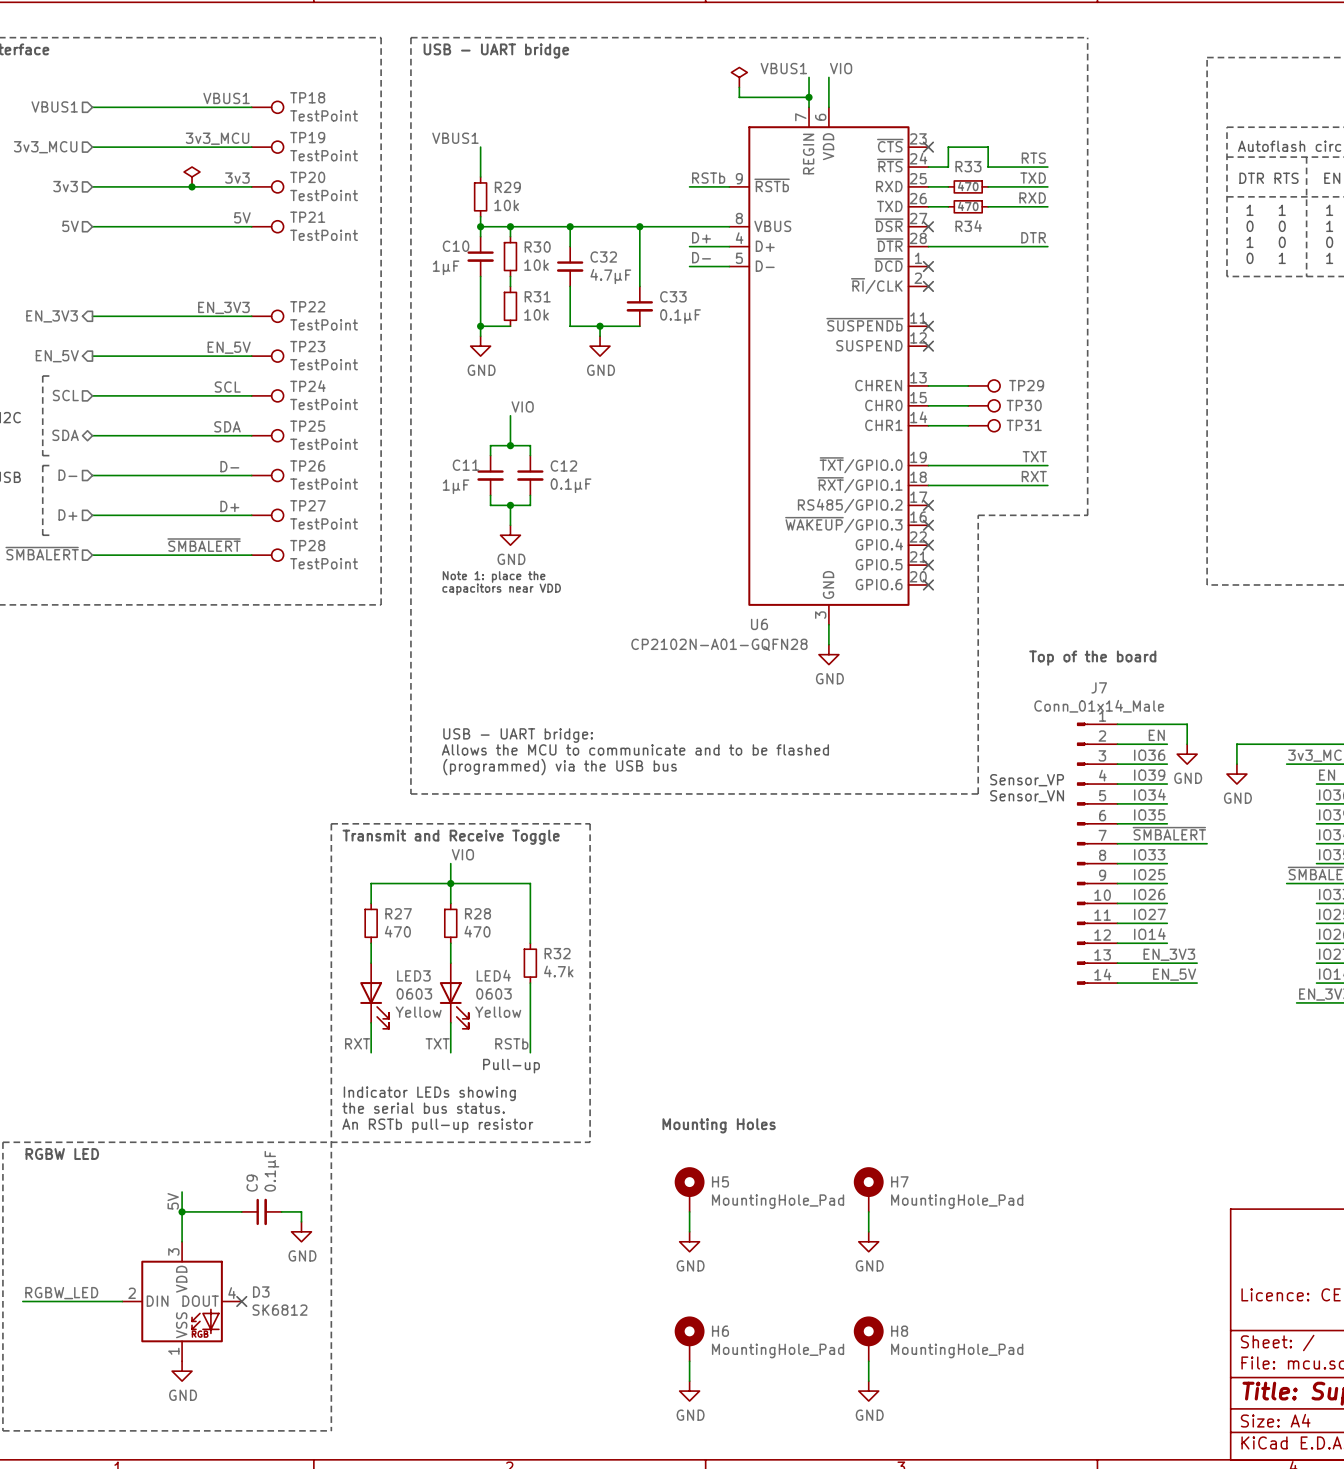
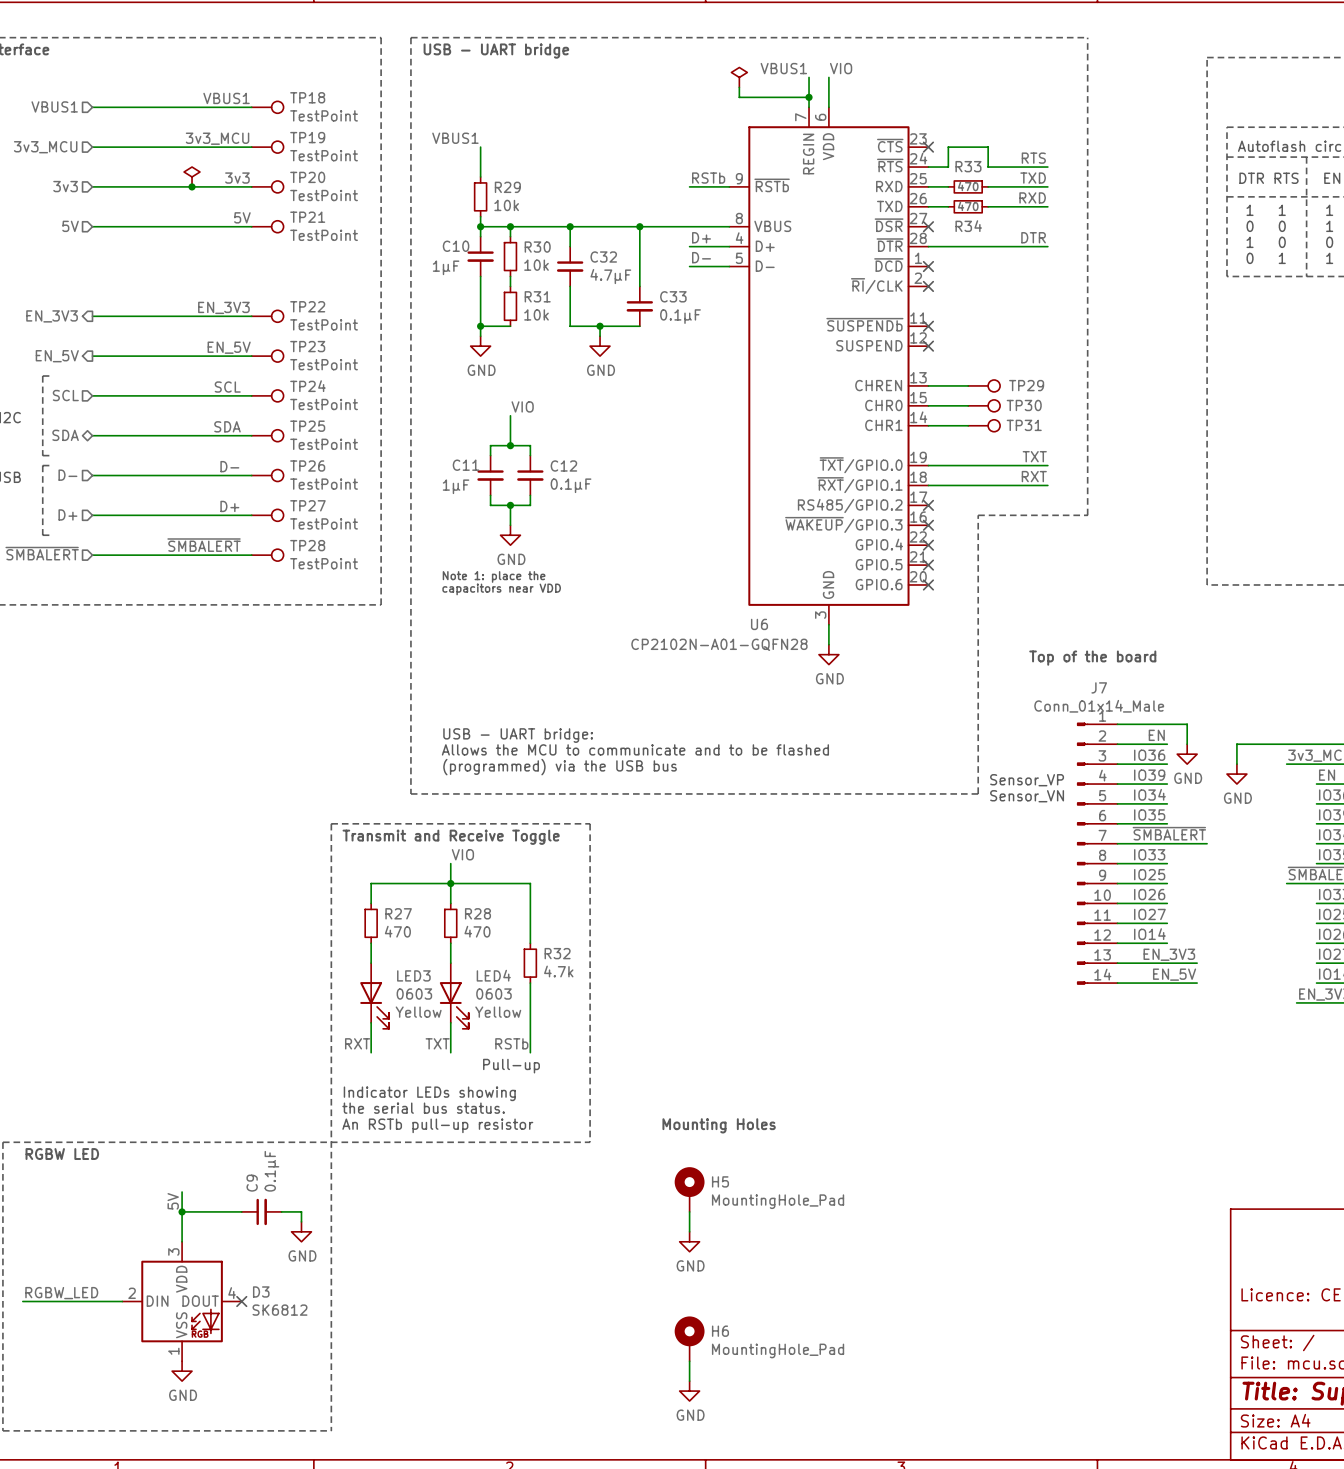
H7: MountingHole_Pad (868, 1189) -> none
wire: (868, 1211) (868, 1231) -> none
power symbol: GND (868, 1241) -> none
H8: MountingHole_Pad (868, 1338) -> none
wire: (868, 1361) (868, 1381) -> none
power symbol: GND (868, 1391) -> none

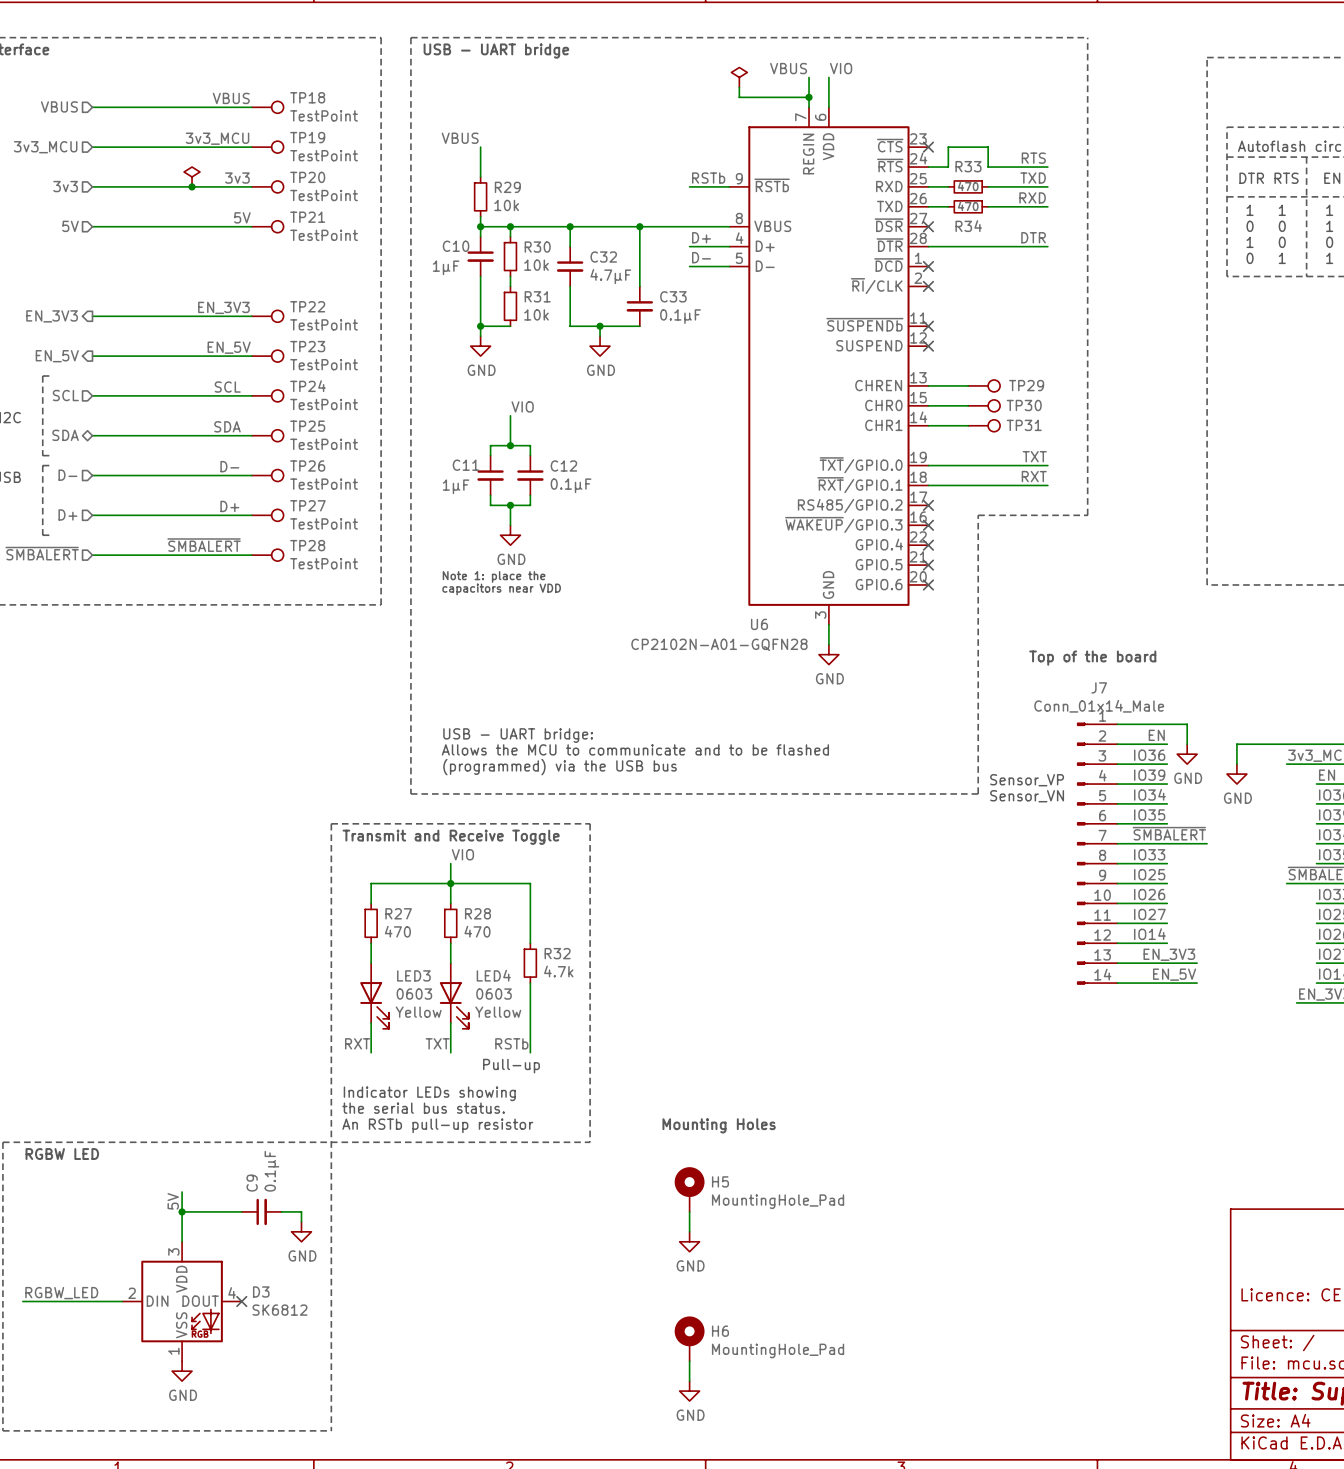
label: VBUS1 (783, 68) -> VBUS (788, 68)
label: VBUS1 (226, 98) -> VBUS (231, 98)
hierarchical label: VBUS1 (54, 106) -> VBUS (59, 106)
label: VBUS1 (455, 138) -> VBUS (460, 138)

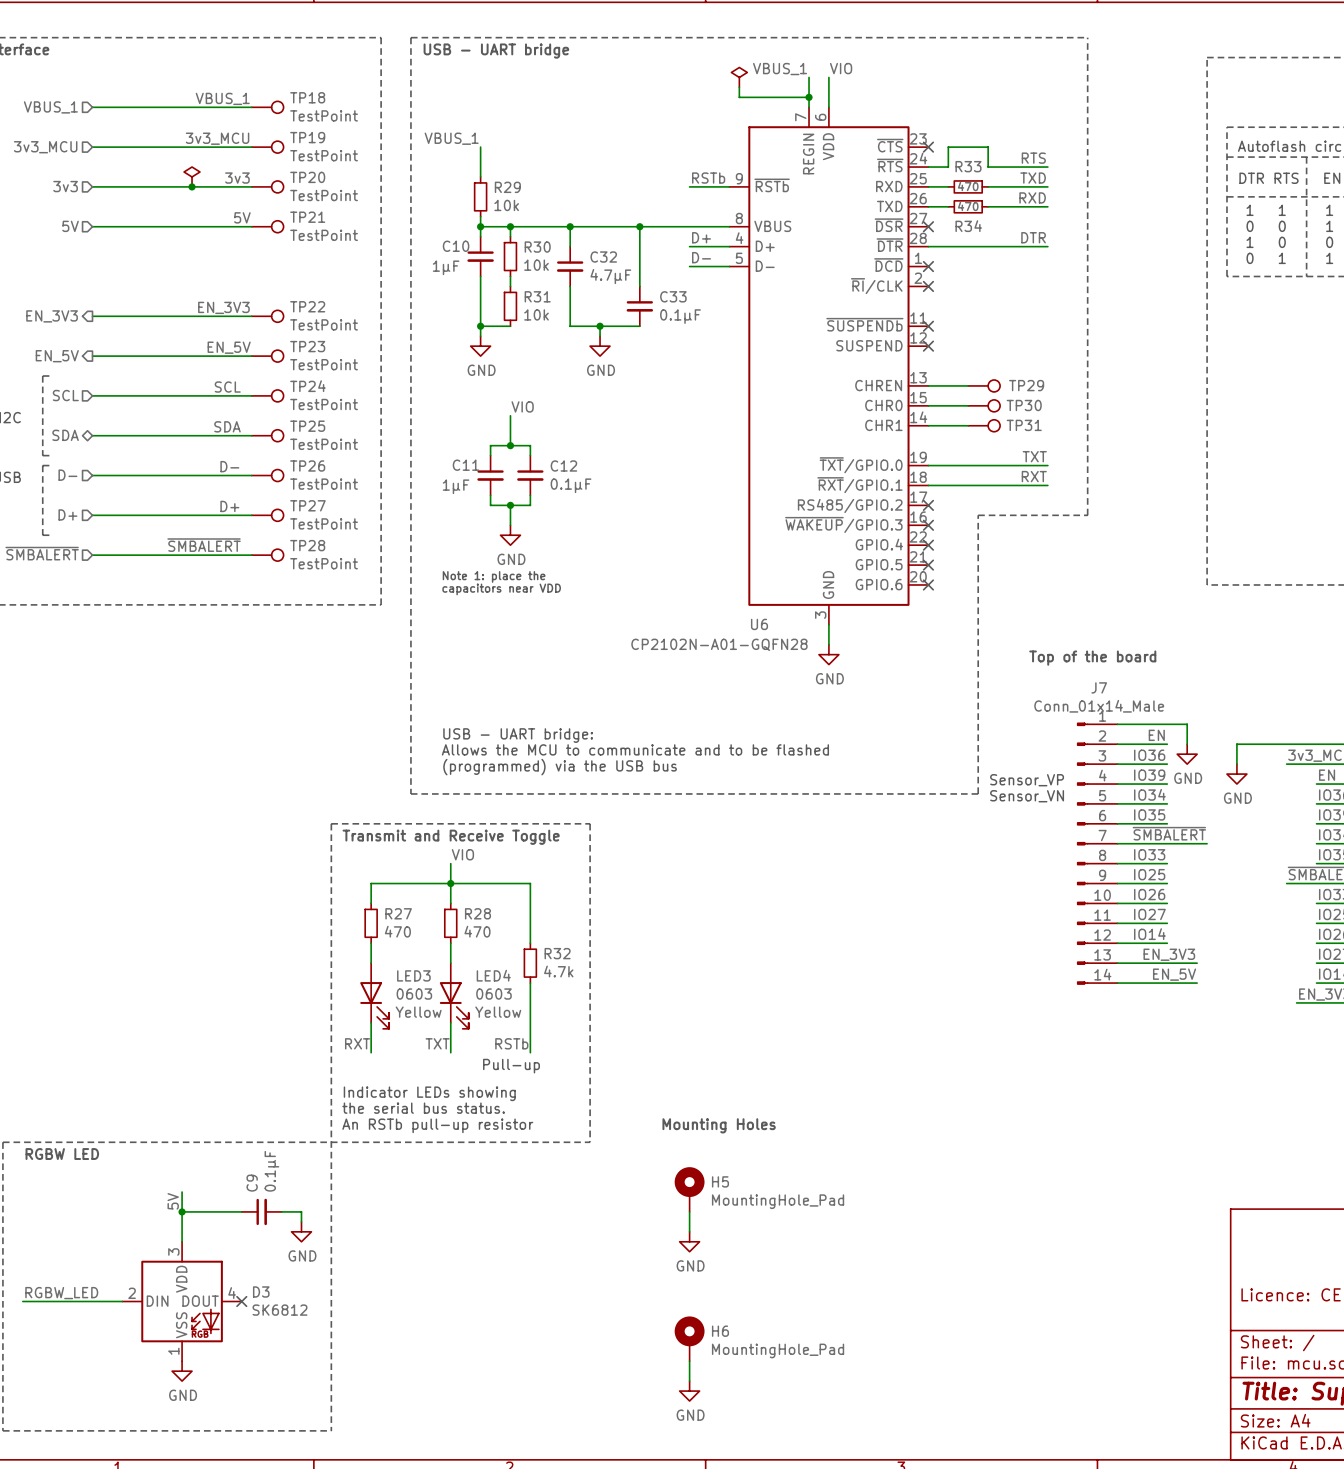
label: VBUS (788, 68) -> VBUS_1 (780, 69)
label: VBUS (231, 98) -> VBUS_1 (222, 98)
hierarchical label: VBUS (59, 106) -> VBUS_1 (50, 107)
label: VBUS (460, 138) -> VBUS_1 (451, 138)

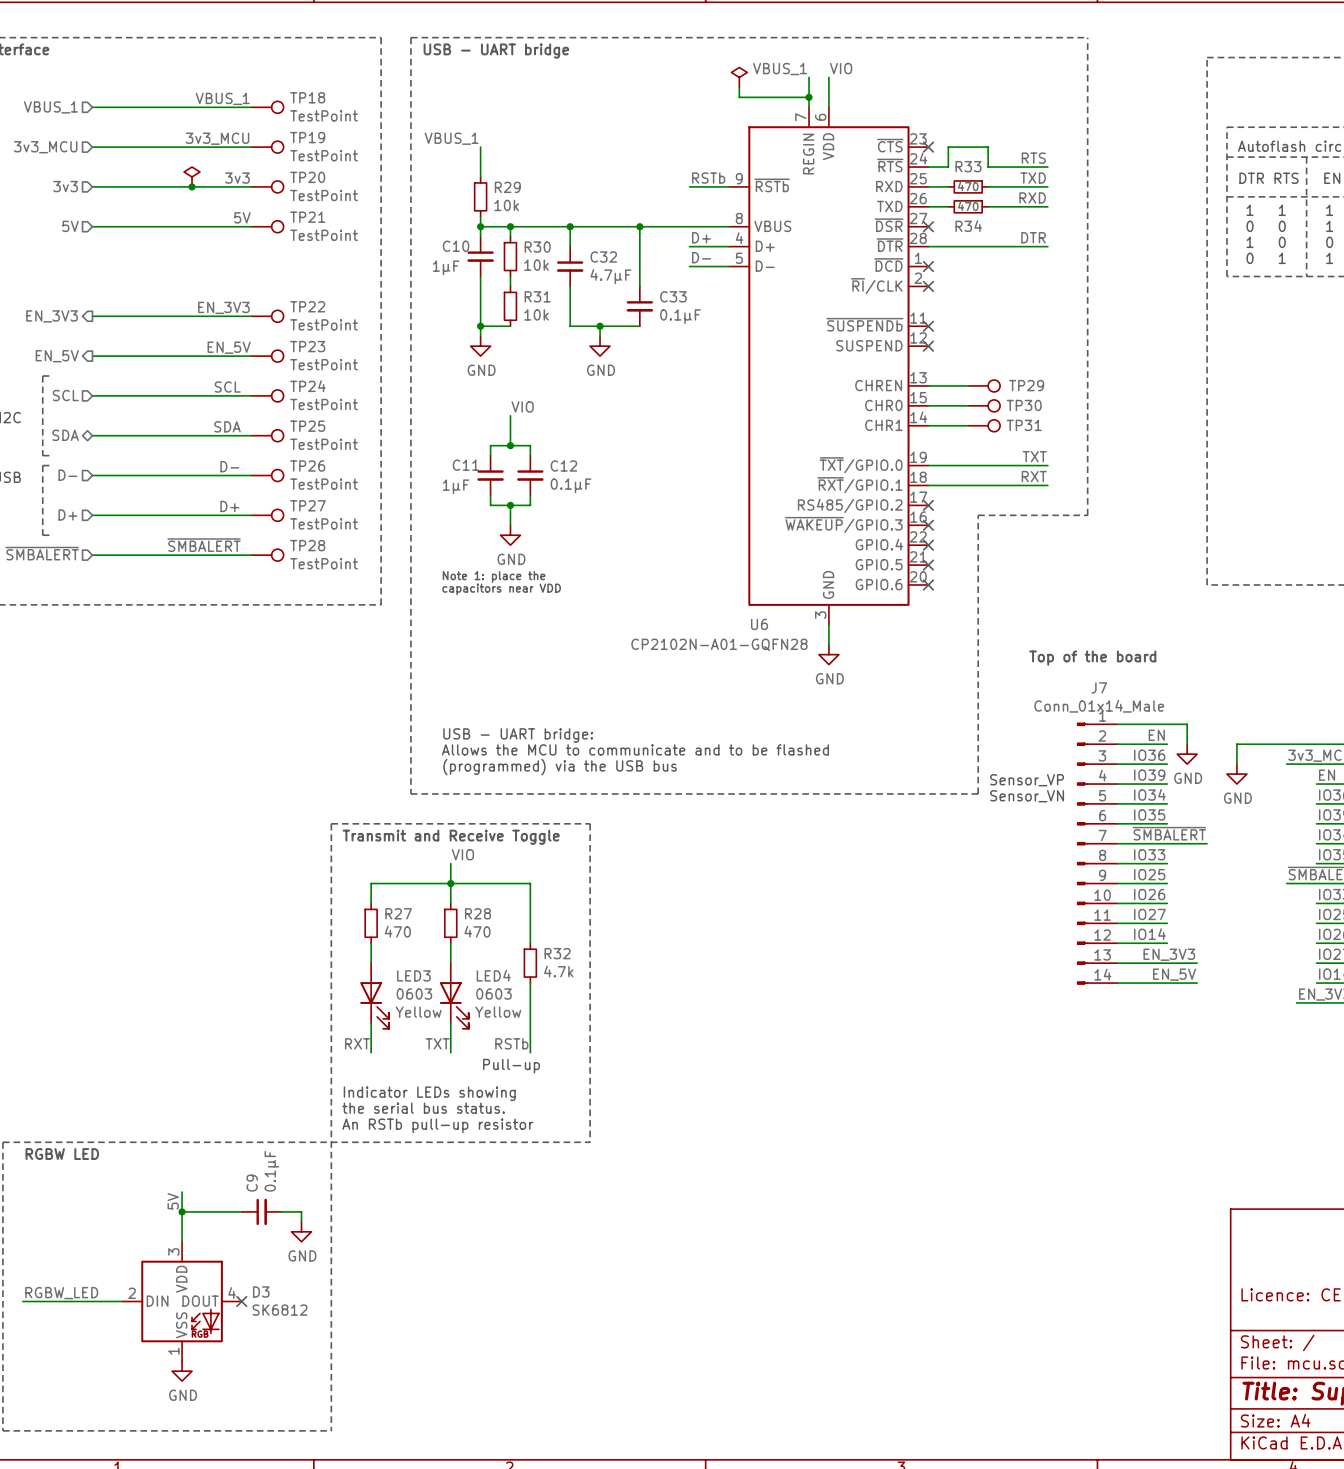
text: Mounting Holes (719, 1125) -> none
H5: MountingHole_Pad (689, 1189) -> none
wire: (689, 1211) (689, 1231) -> none
power symbol: GND (689, 1241) -> none
H6: MountingHole_Pad (689, 1338) -> none
wire: (689, 1361) (689, 1381) -> none
power symbol: GND (689, 1391) -> none

